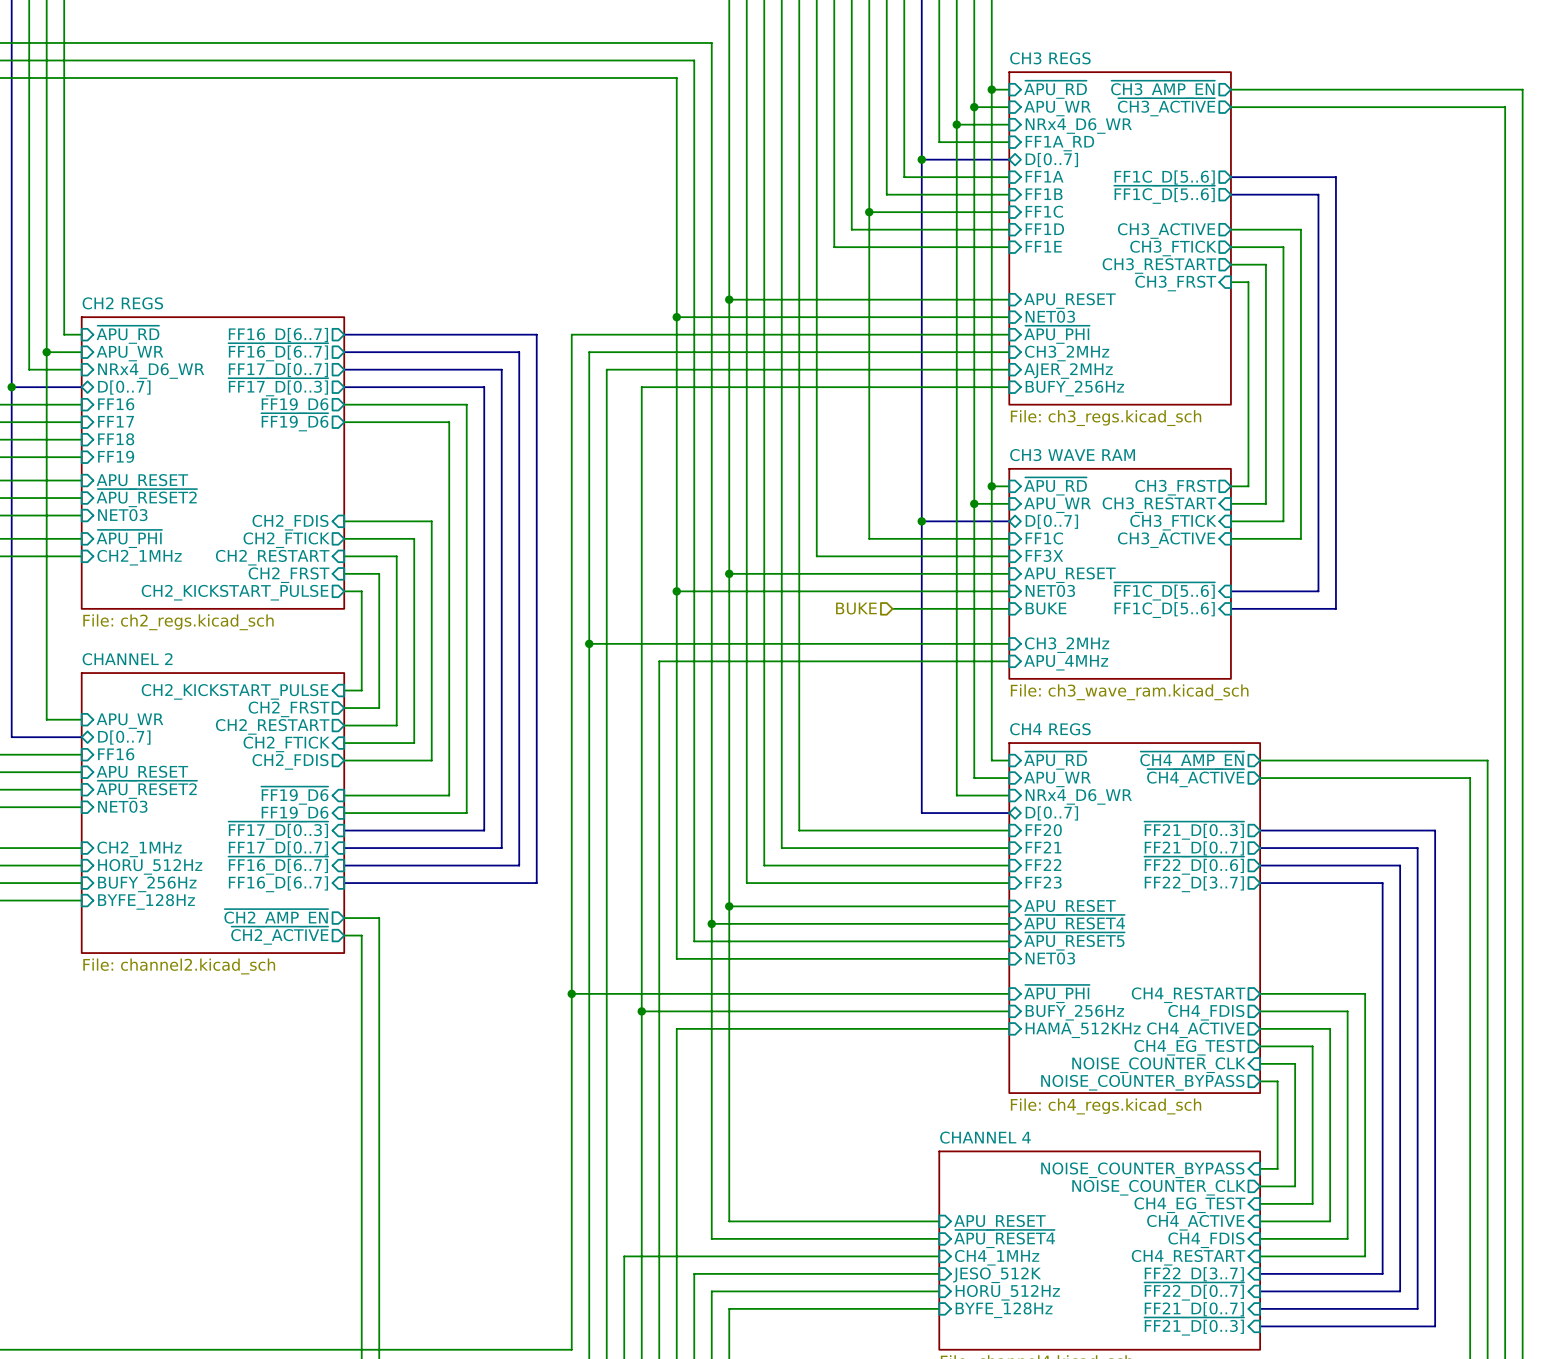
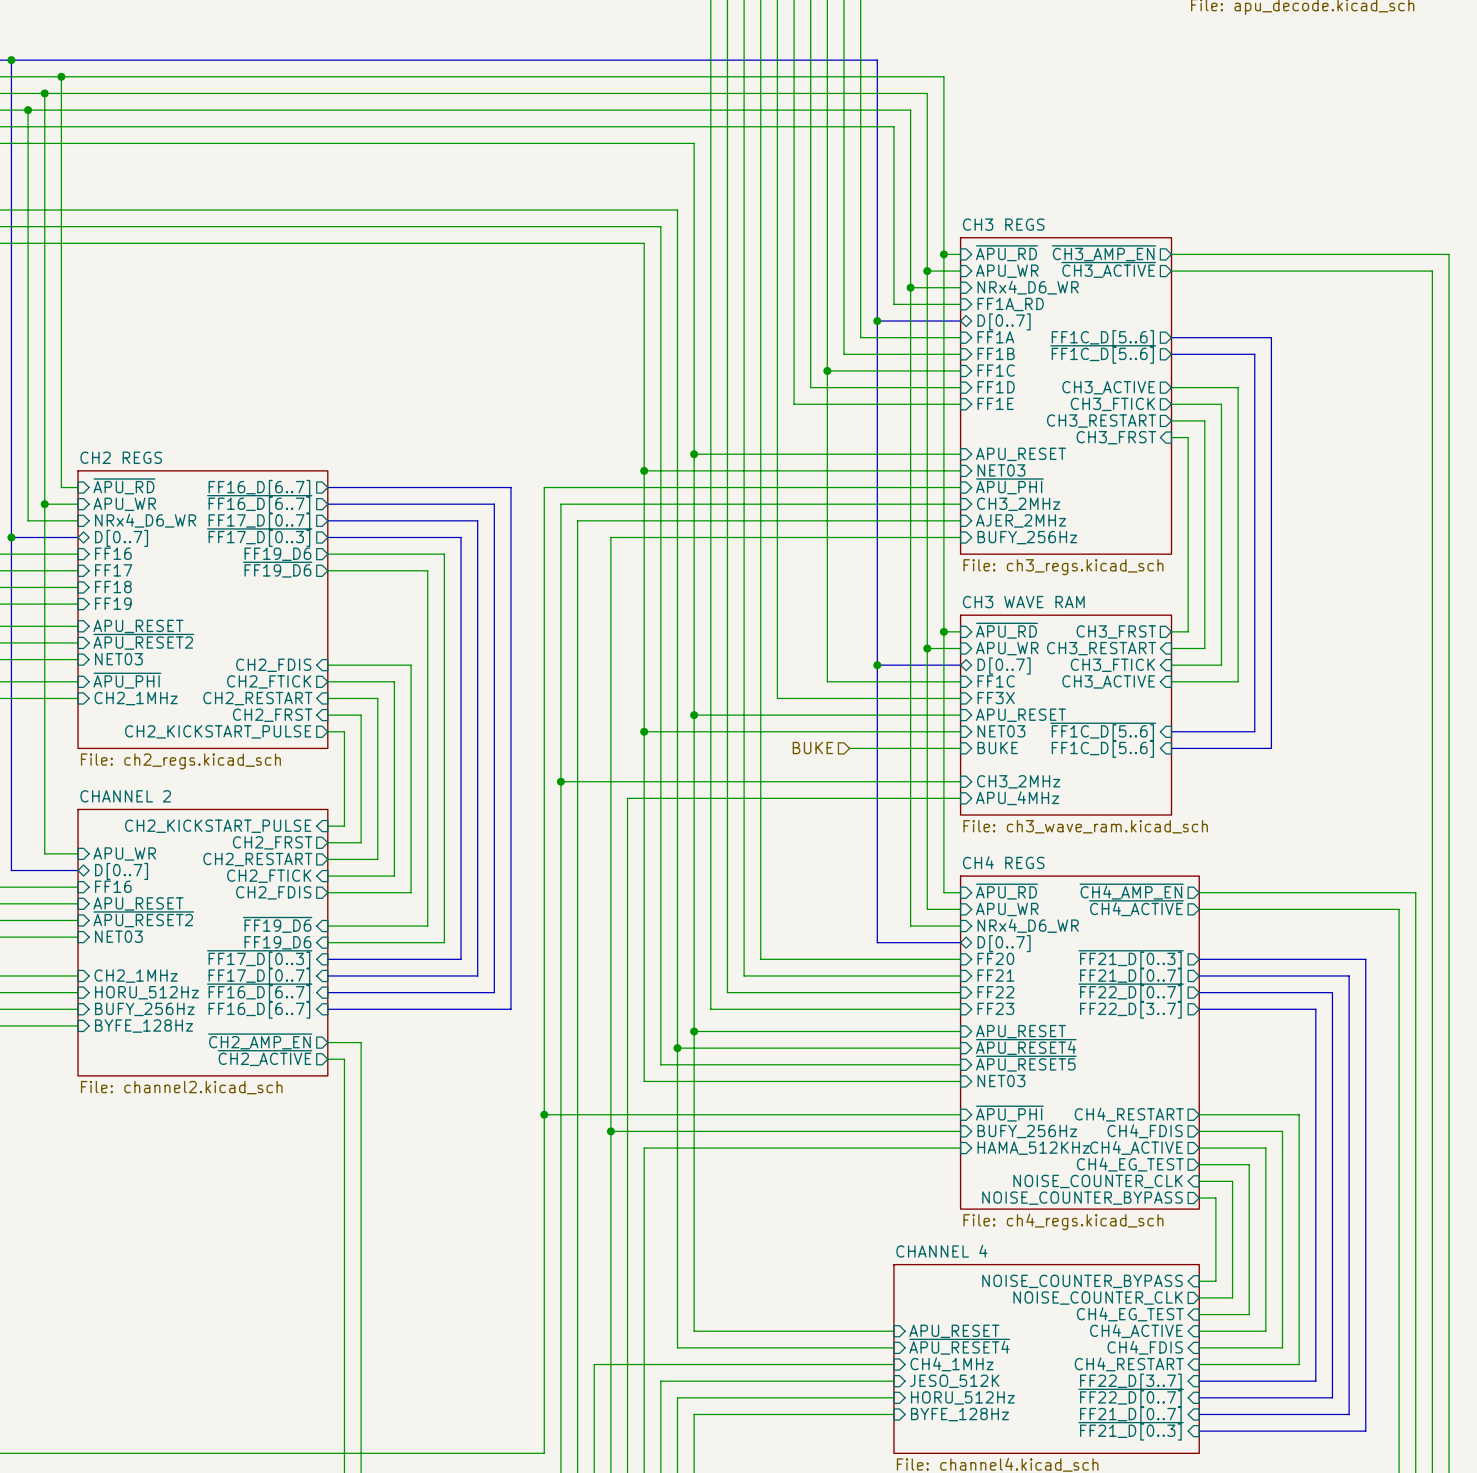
sheet pin: ~{FF22_D[0..6]} (1194, 865) -> ~{FF22_D[0..7]} (1131, 992)

